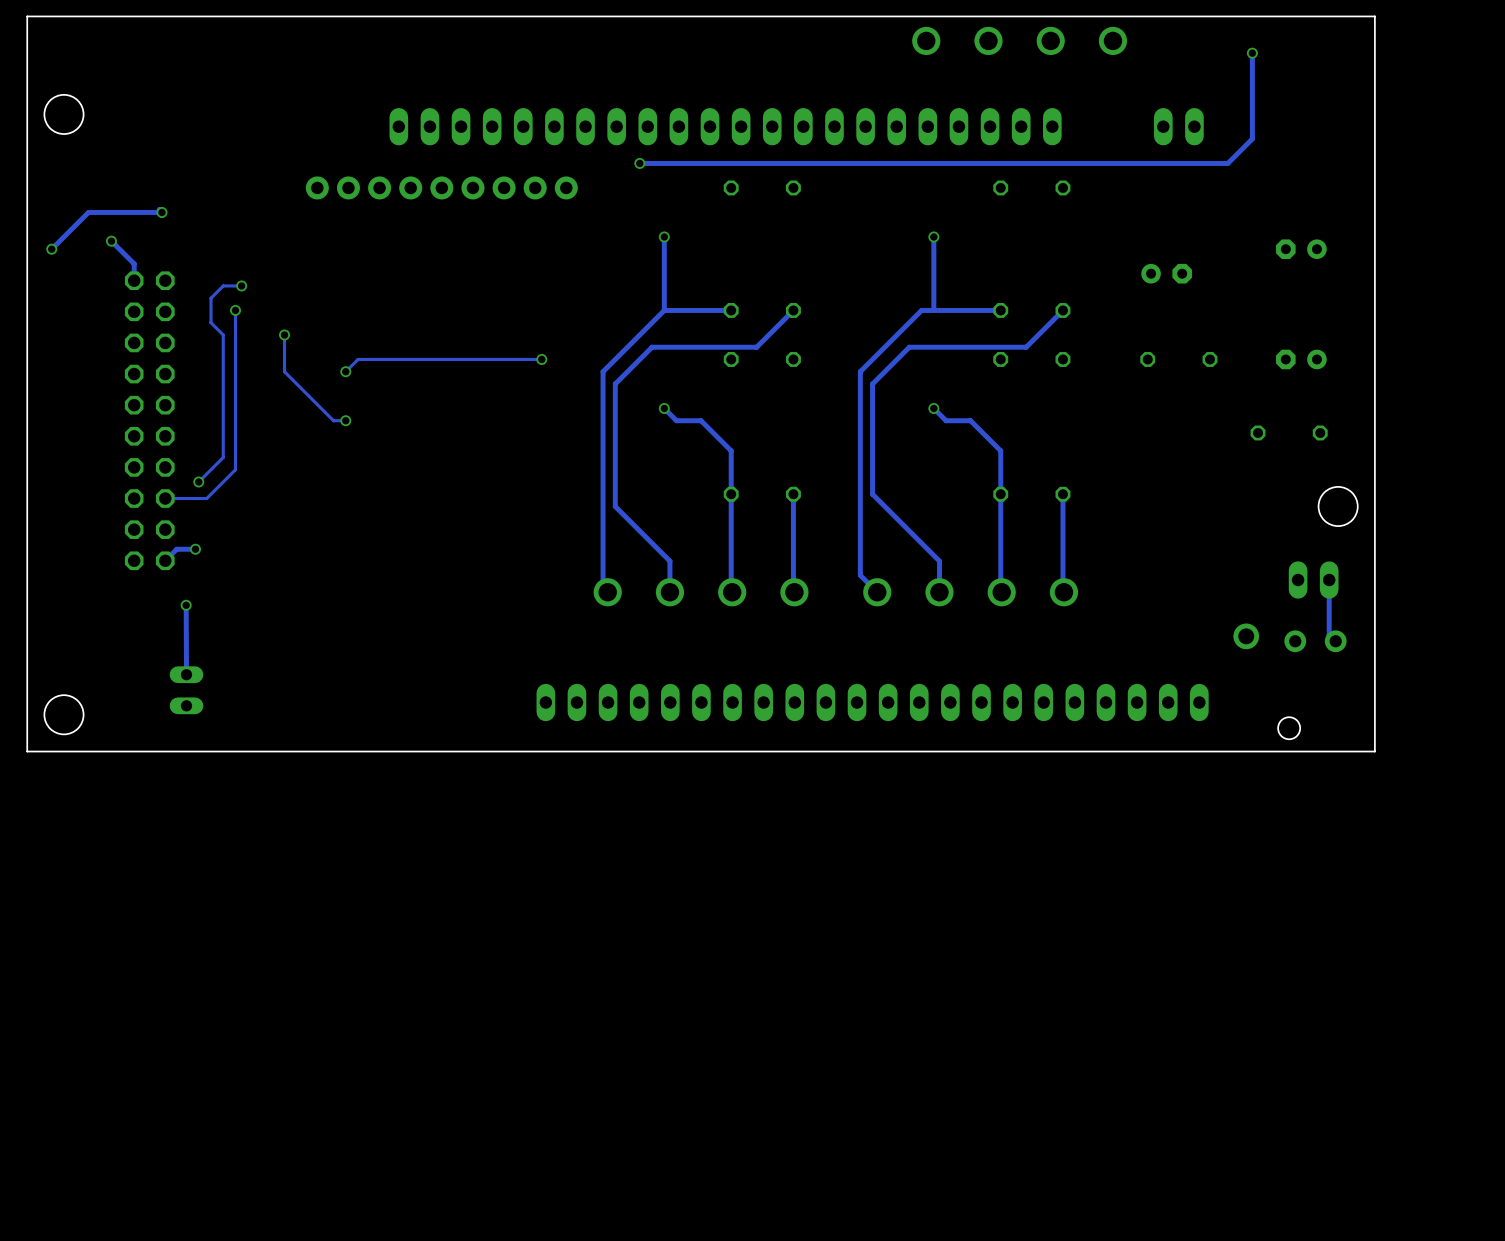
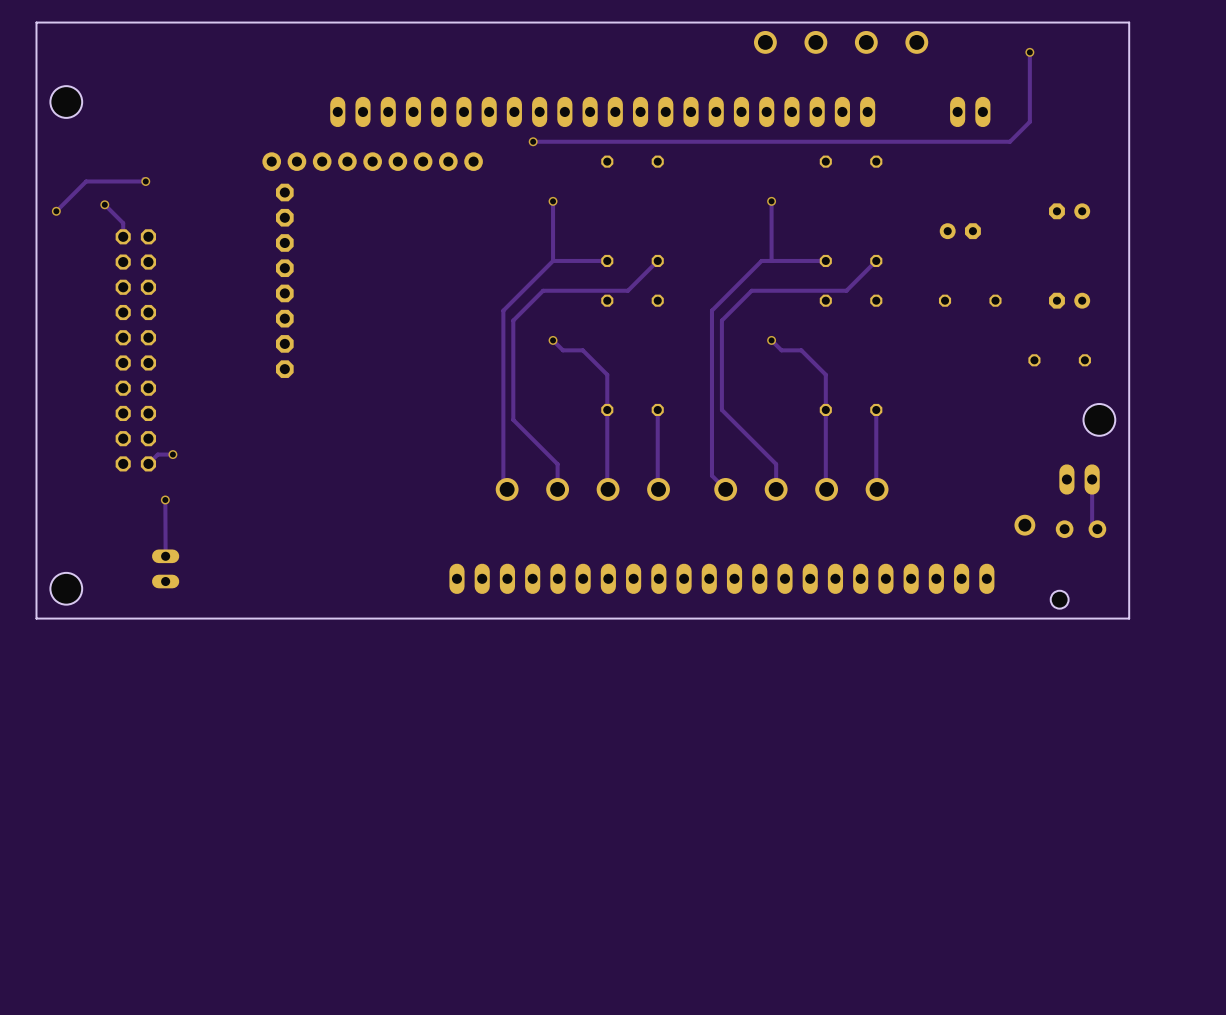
track: (241, 285) (223, 285) (211, 298) (211, 322) (223, 334) (223, 457) (198, 481) -> none
via: (241, 285) -> none
track: (235, 310) (235, 469) (206, 498) (165, 498) -> none
via: (235, 310) -> none
track: (284, 334) (284, 371) (333, 420) (345, 420) -> none
via: (284, 334) -> none
part: none -> (284, 280)
track: (541, 359) (358, 359) (345, 371) -> none
via: (541, 359) -> none
via: (345, 371) -> none
via: (345, 420) -> none
via: (198, 481) -> none

